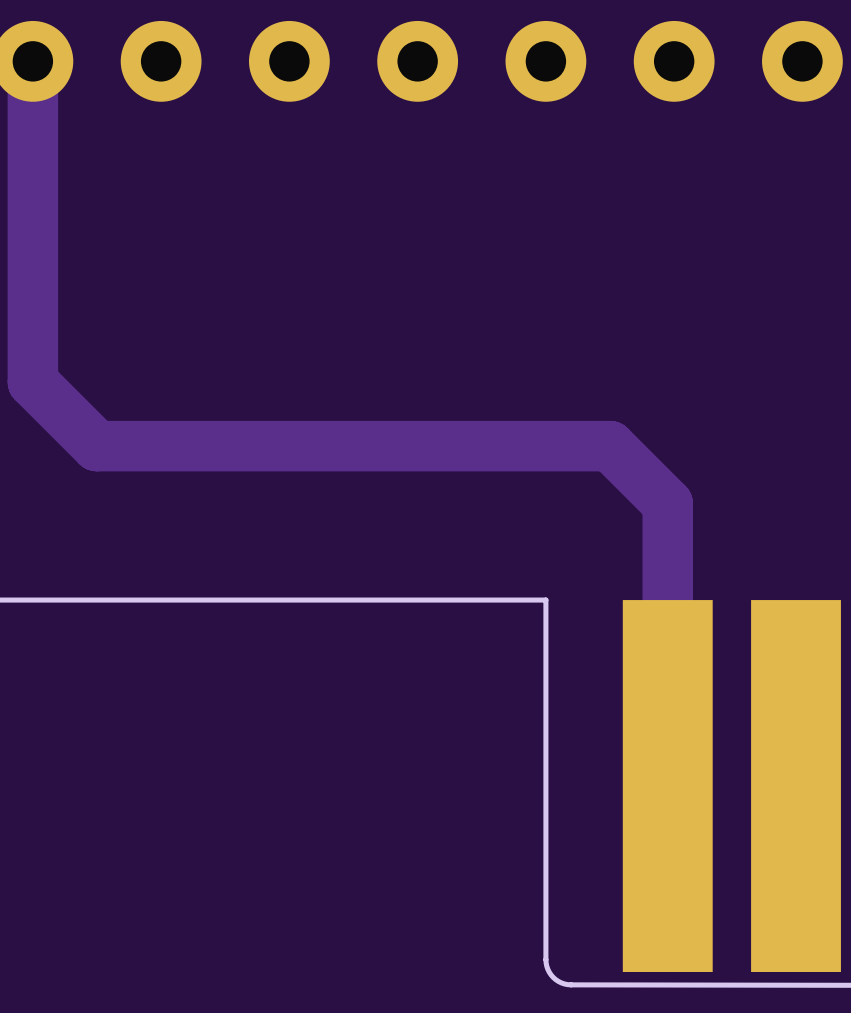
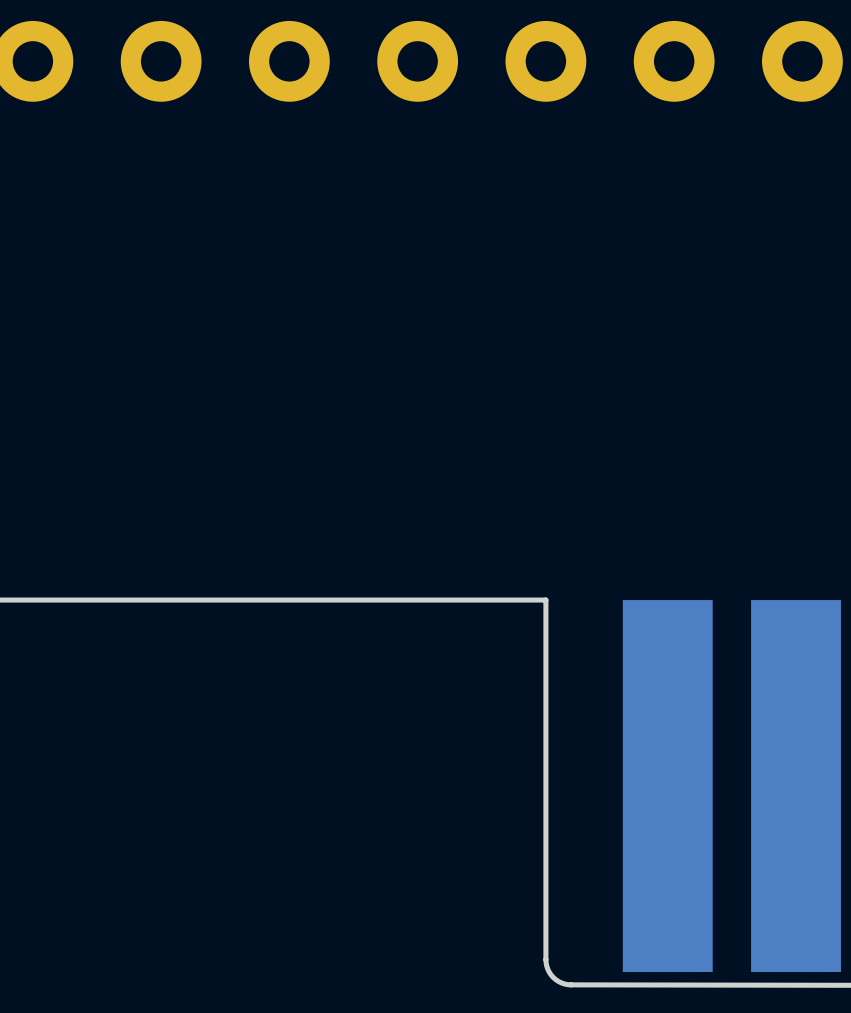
track: (32, 61) (32, 382) (97, 446) (610, 446) (667, 503) (667, 792) -> none

